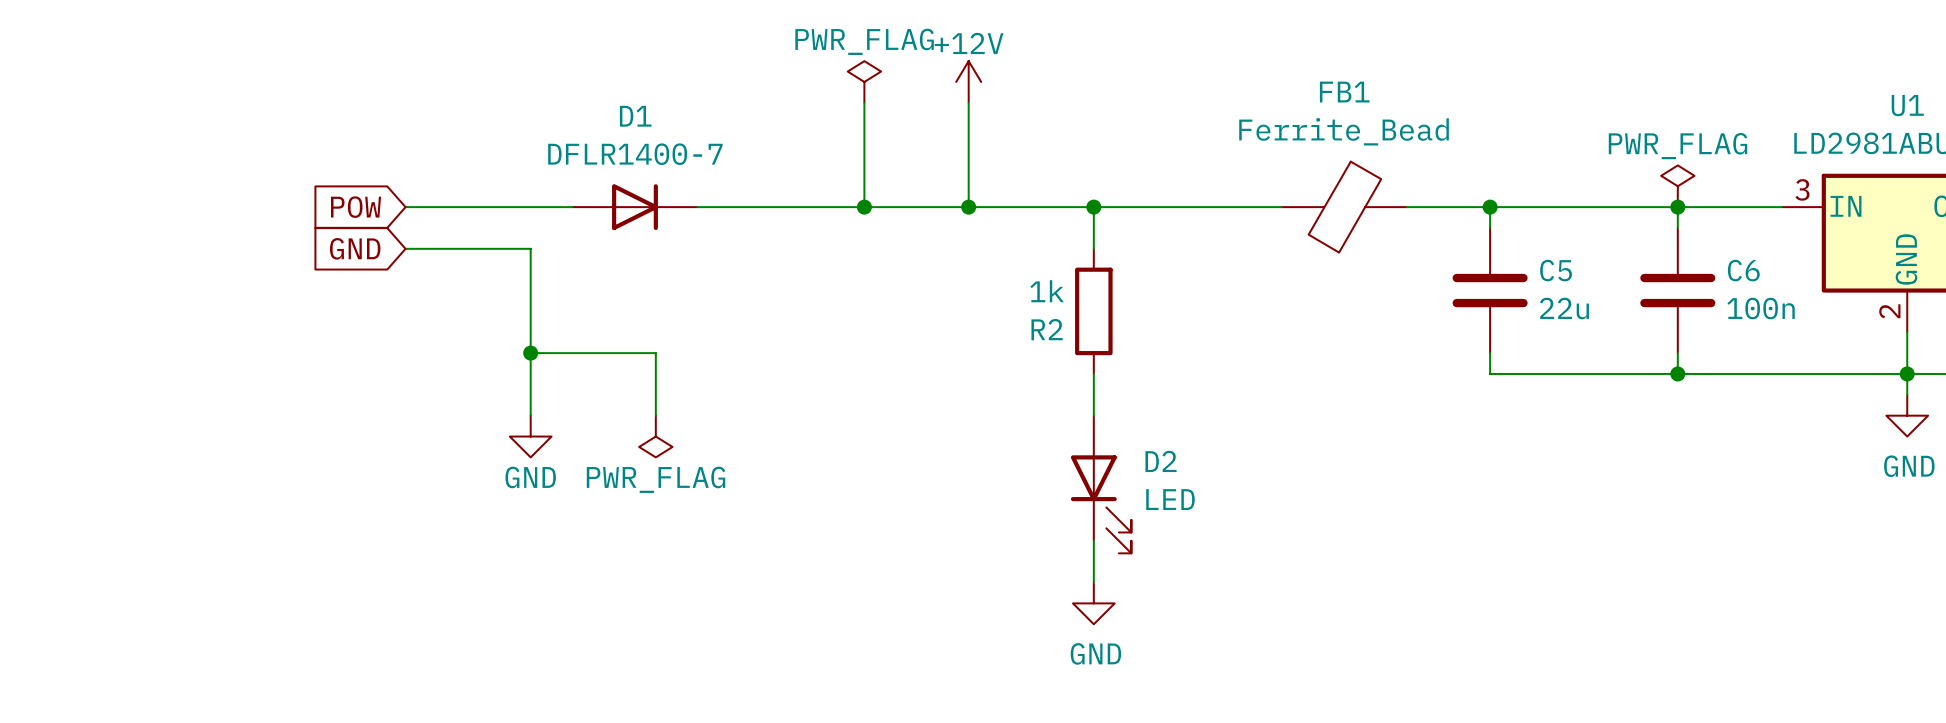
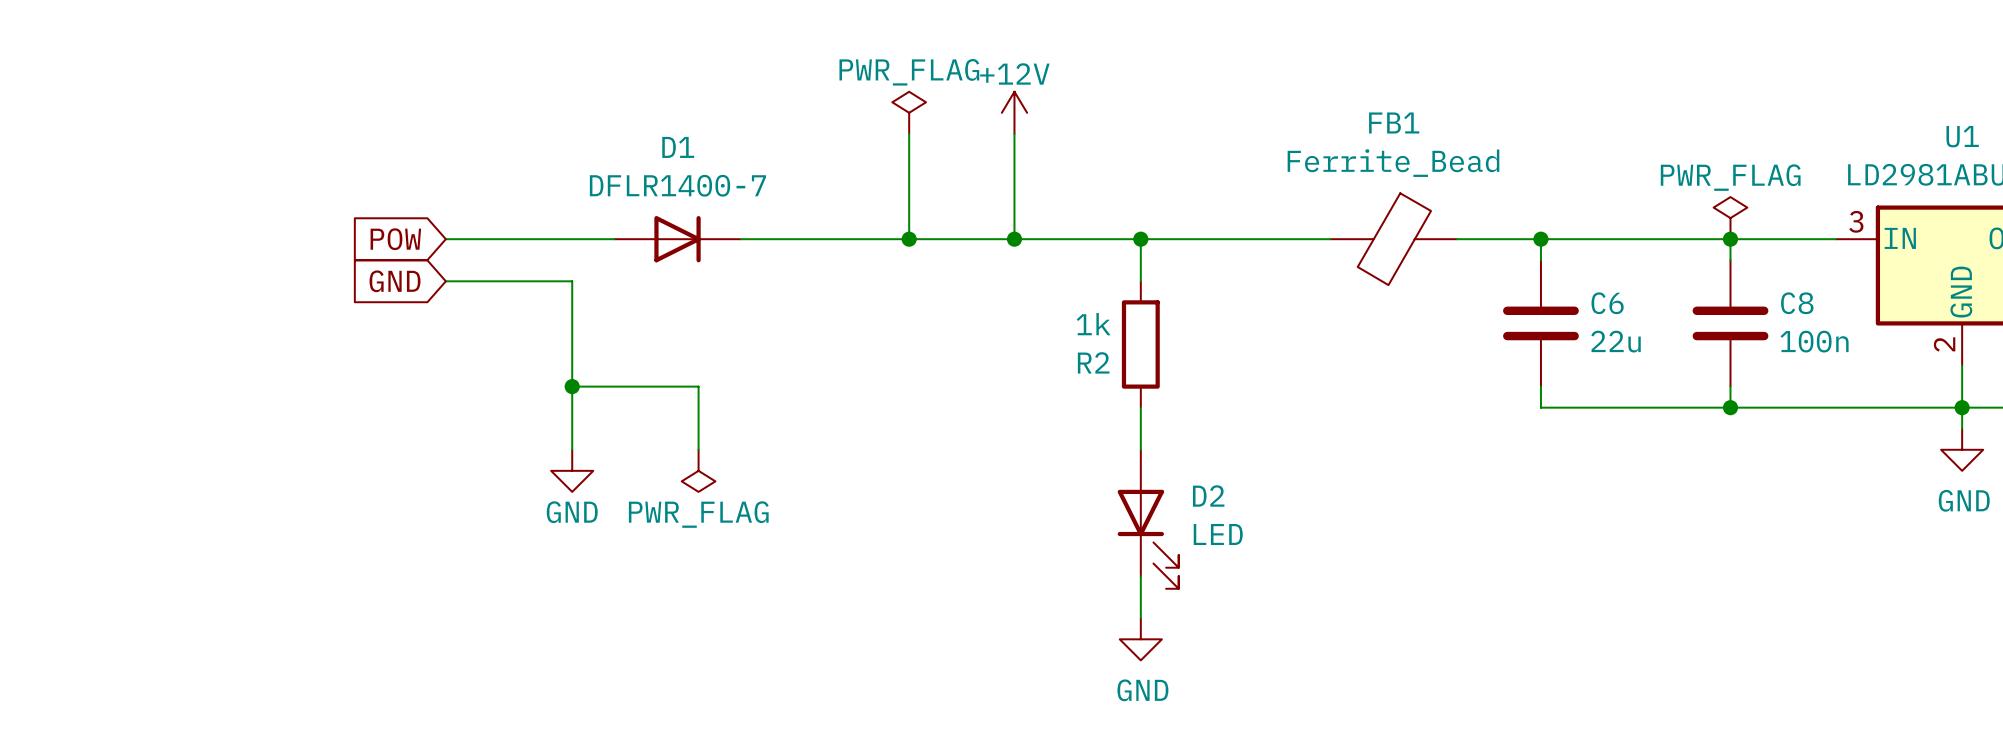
C5 name: C5 (1556, 270) -> C6 (1607, 303)
C6 name: C6 (1743, 270) -> C8 (1797, 303)

